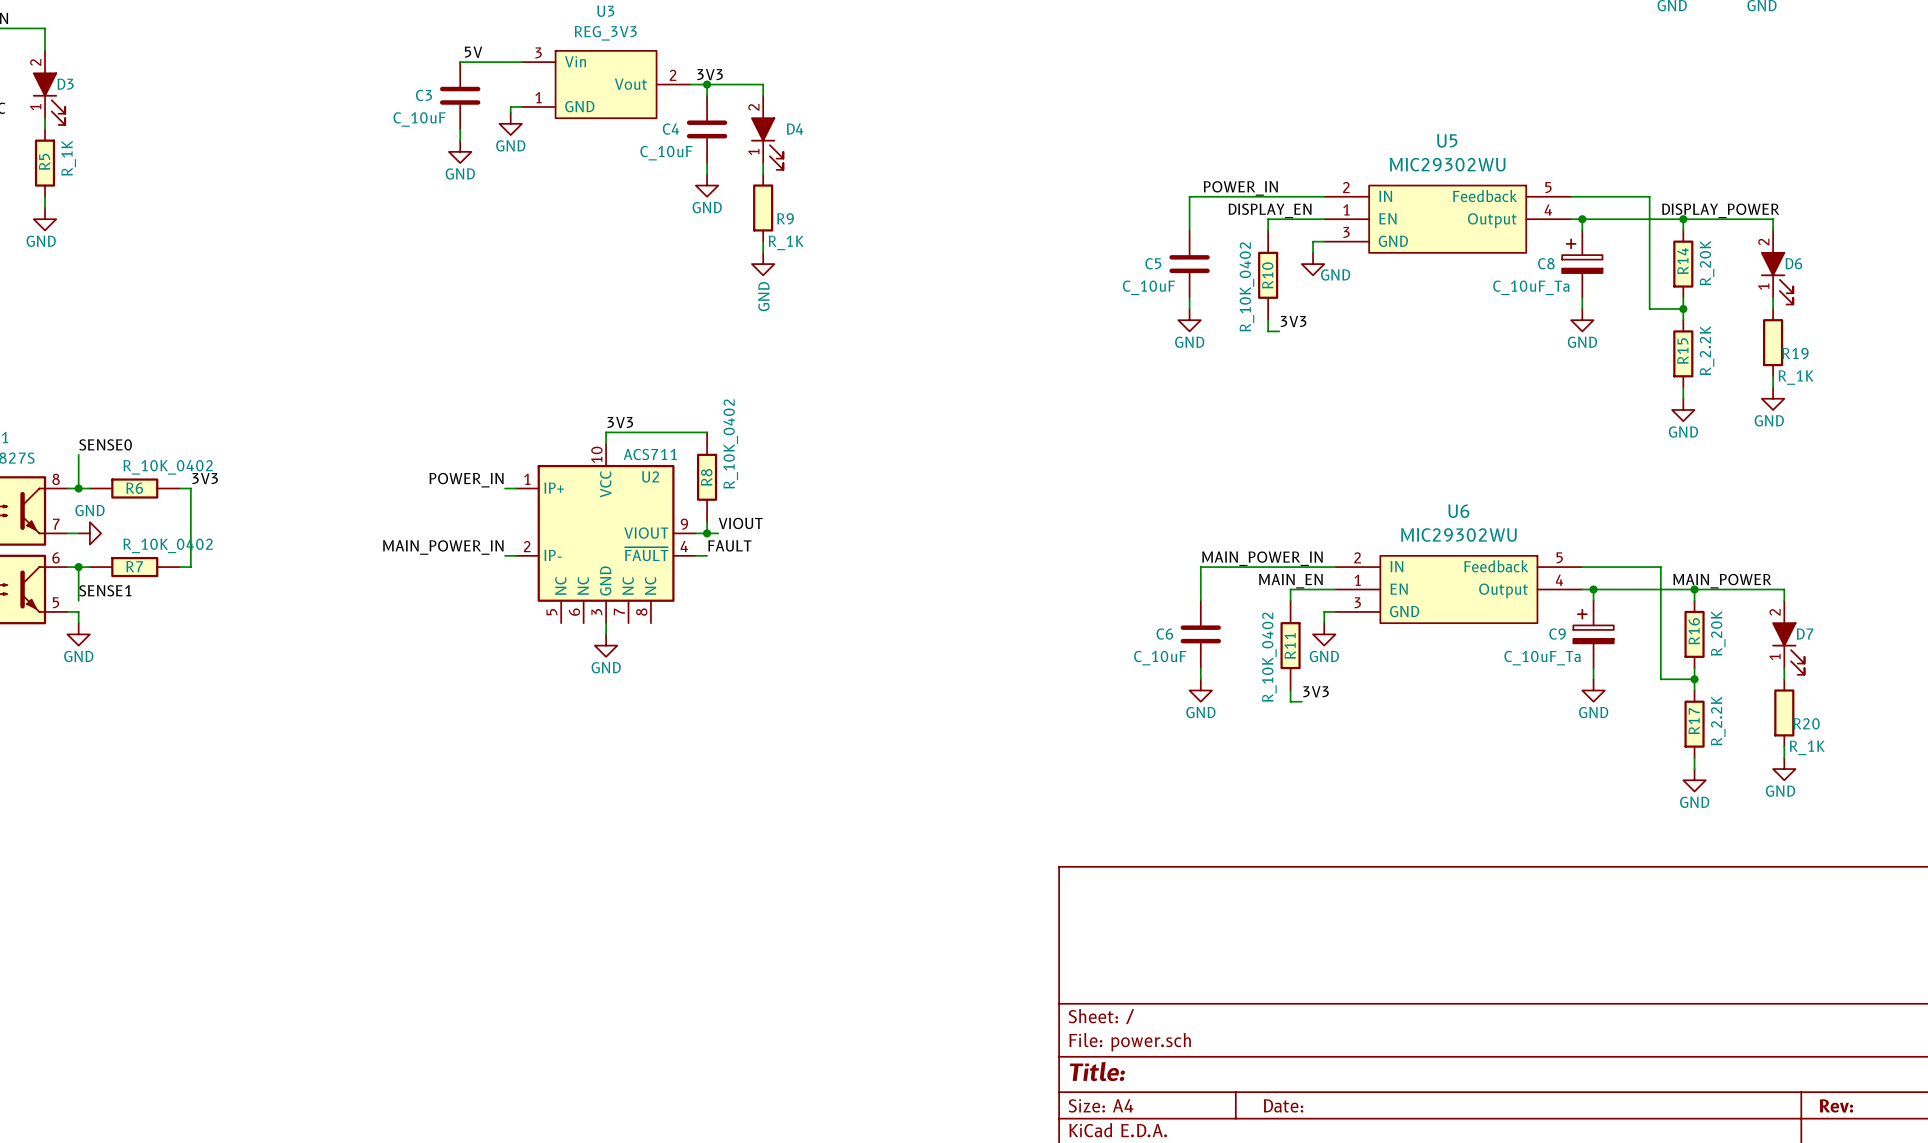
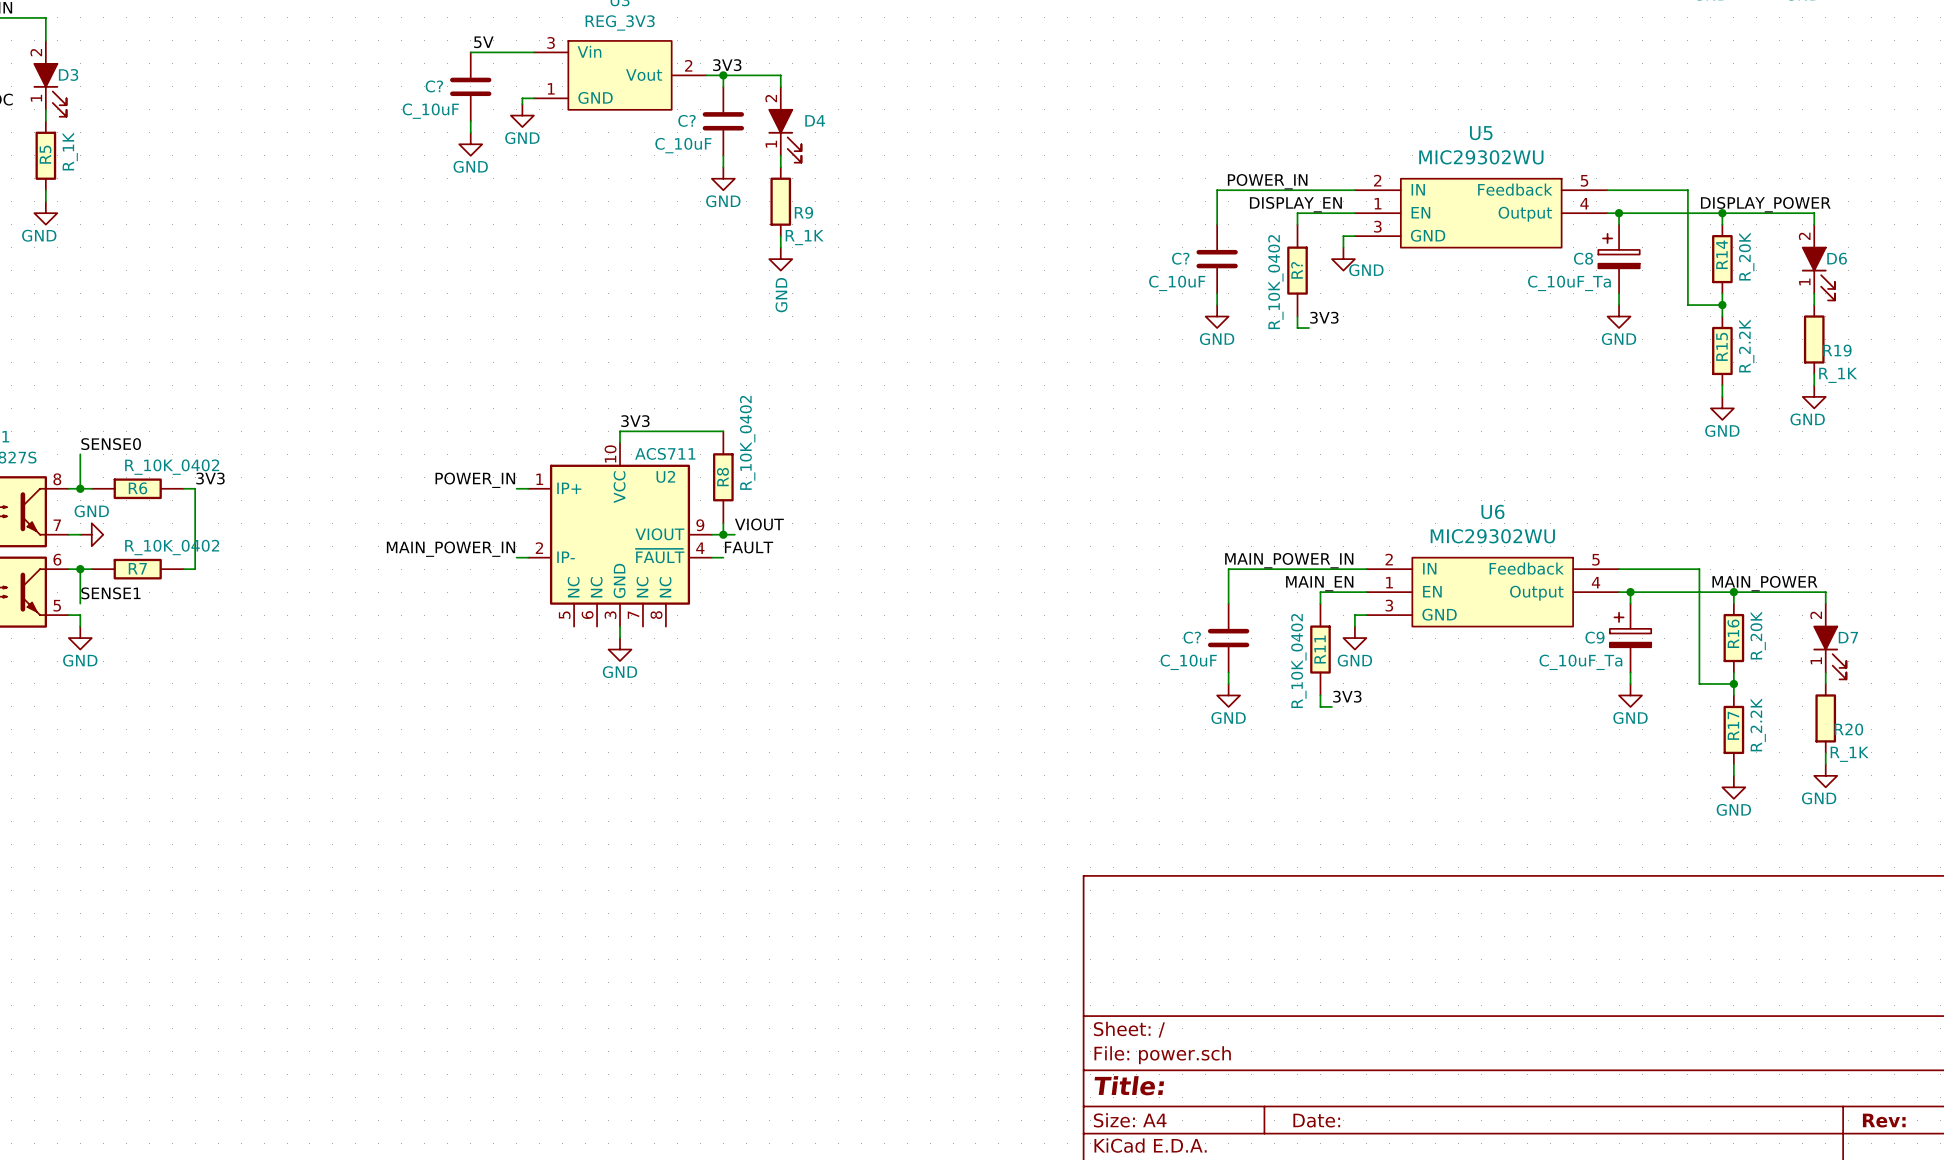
C3 name: C3 (423, 95) -> C? (434, 86)
C4 name: C4 (671, 129) -> C? (686, 120)
C5 name: C5 (1153, 263) -> C? (1180, 258)
R10 name: R10 (1267, 275) -> R? (1296, 270)
C6 name: C6 (1164, 634) -> C? (1192, 637)

